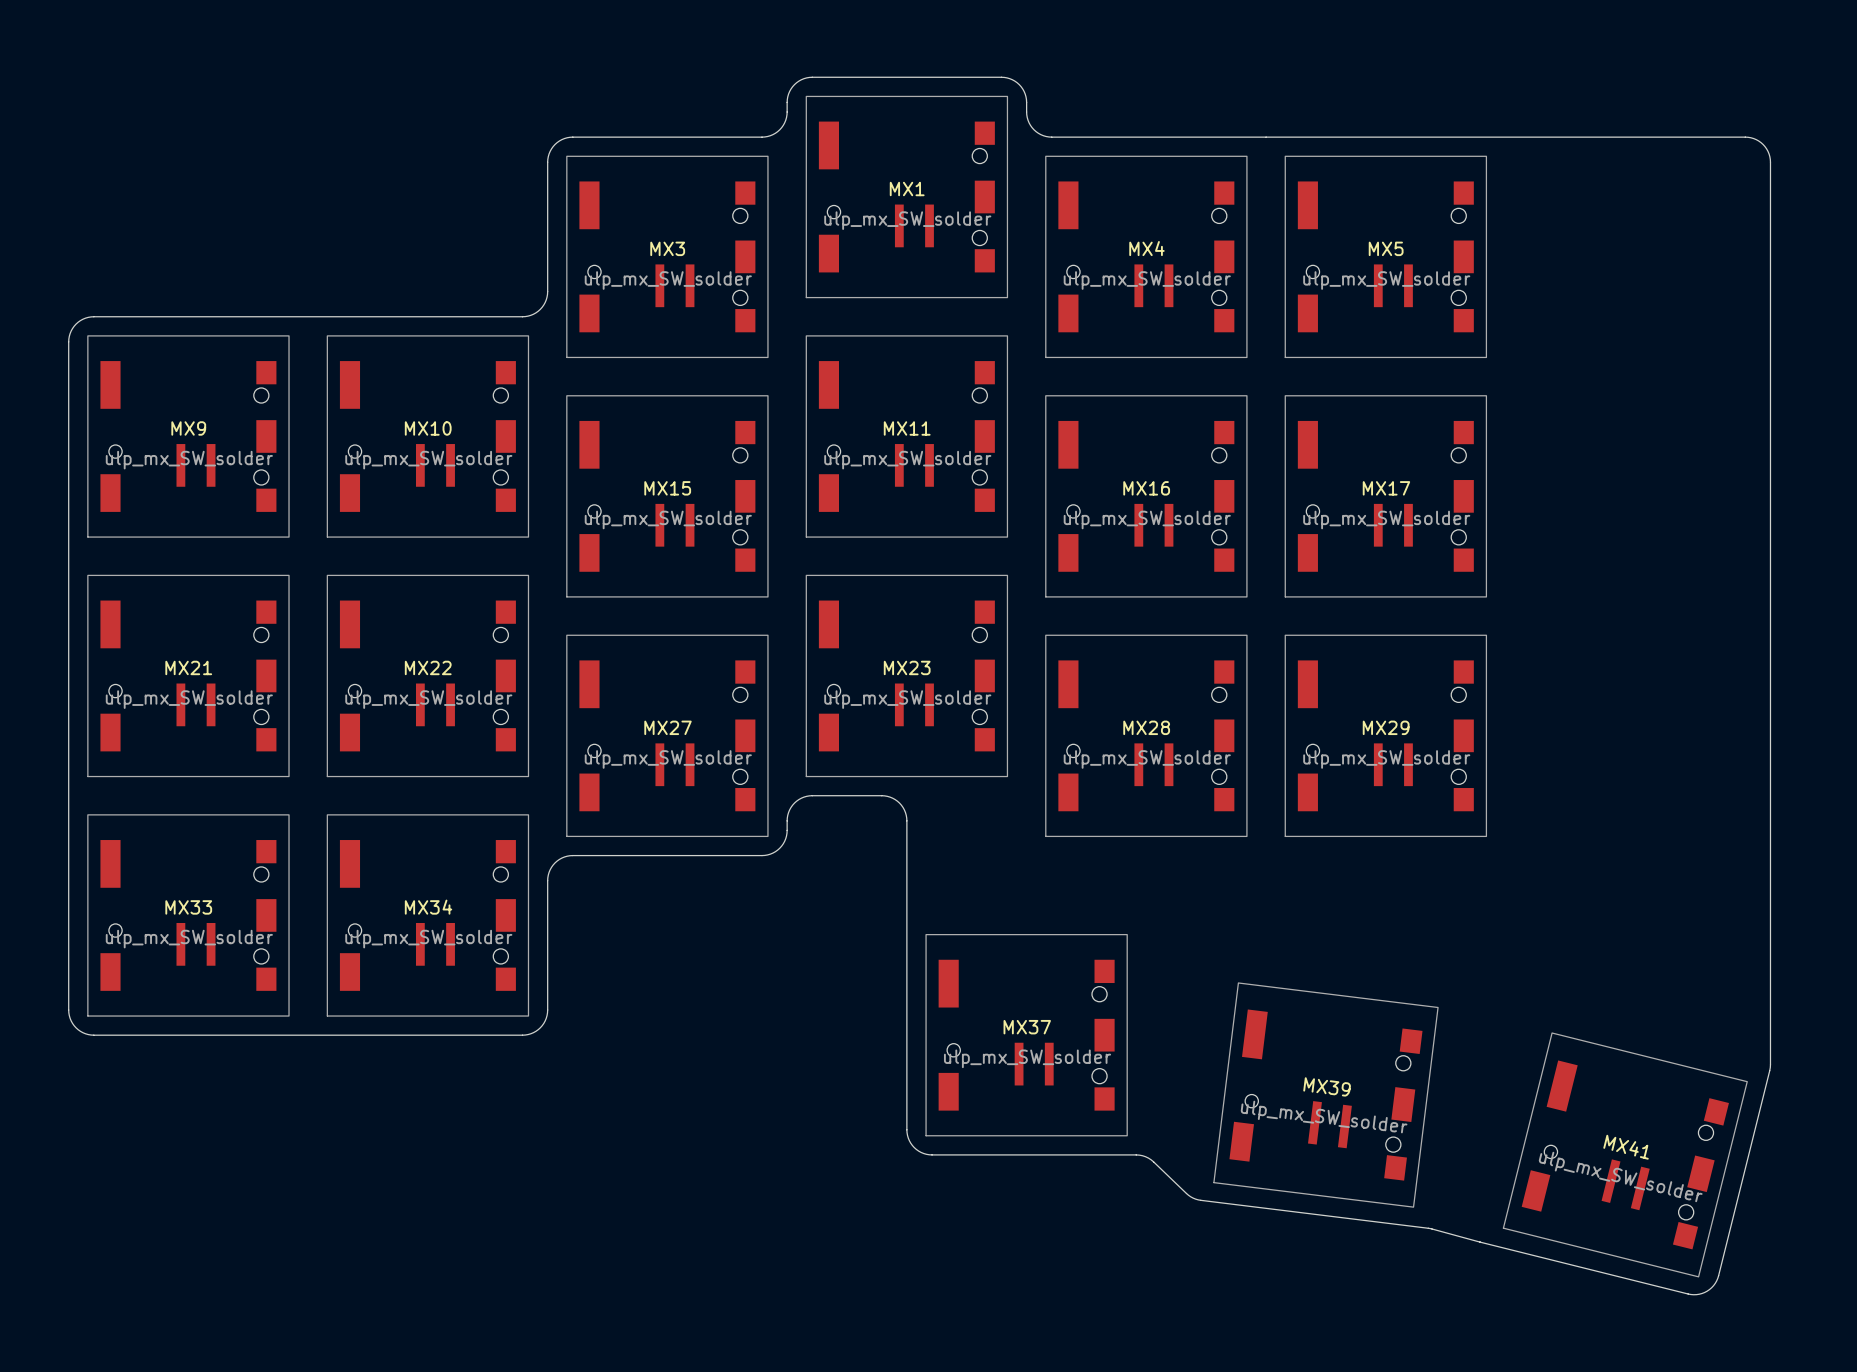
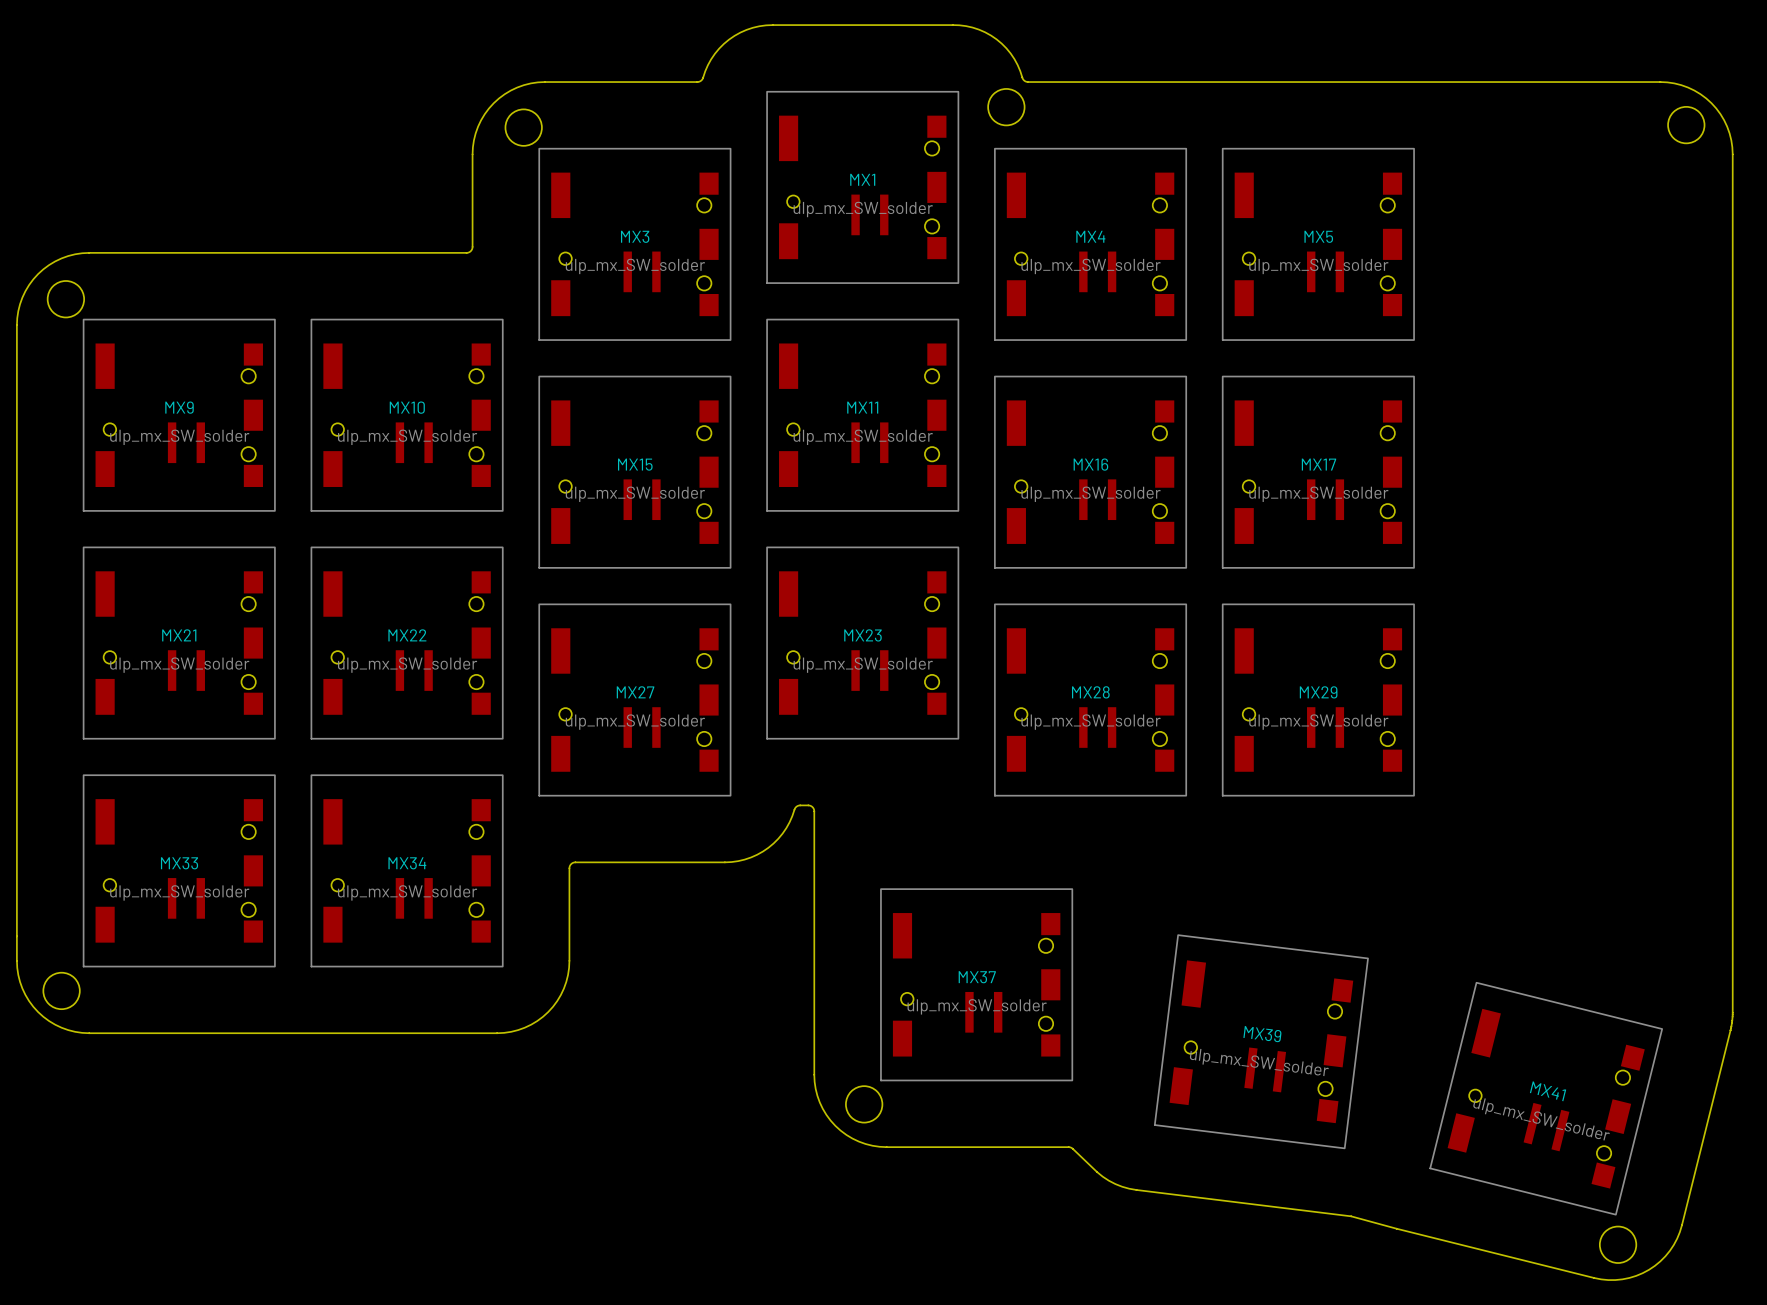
board edge: (812, 77) (1007, 77) (1017, 82) (1024, 91) (1027, 117) (1030, 125) (1038, 133) (1048, 136) (1745, 137) (1756, 139) (1764, 146) (1770, 162) (1770, 1064) (1718, 1275) (1709, 1289) (1699, 1294) (1688, 1294) (1430, 1228) (1198, 1199) (1188, 1195) (1151, 1159) (1139, 1155) (932, 1154) (918, 1151) (909, 1140) (906, 1129) (906, 818) (899, 803) (884, 795) (812, 795) (801, 798) (792, 805) (788, 812) (786, 833) (783, 843) (775, 851) (767, 854) (572, 855) (559, 859) (551, 867) (547, 877) (547, 1015) (540, 1027) (528, 1034) (93, 1035) (82, 1032) (74, 1025) (68, 1010) (68, 341) (74, 326) (82, 319) (93, 316) (530, 315) (542, 307) (547, 294) (547, 159) (551, 148) (557, 142) (572, 137) (767, 136) (777, 131) (784, 122) (787, 96) (792, 86) (801, 79) (812, 77) -> (1730, 1030) (1732, 1012) (1732, 154) (1729, 133) (1720, 114) (1706, 98) (1688, 87) (1660, 82) (1027, 81) (1023, 79) (1014, 59) (1001, 43) (985, 32) (966, 26) (766, 25) (746, 29) (723, 43) (711, 59) (702, 79) (698, 81) (537, 82) (517, 87) (499, 98) (481, 120) (473, 140) (472, 246) (468, 252) (82, 253) (61, 258) (43, 269) (33, 279) (22, 297) (16, 325) (17, 967) (20, 981) (29, 1001) (43, 1016) (61, 1027) (89, 1033) (497, 1033) (518, 1030) (531, 1024) (548, 1012) (557, 1001) (566, 981) (569, 960) (569, 868) (571, 863) (724, 862) (744, 859) (762, 851) (778, 838) (786, 828) (796, 806) (808, 805) (812, 807) (814, 811) (814, 1081) (817, 1095) (826, 1114) (835, 1125) (852, 1138) (865, 1144) (886, 1147) (1069, 1147) (1102, 1176) (1129, 1188) (1351, 1216) (1608, 1280) (1629, 1277) (1649, 1269) (1665, 1256) (1677, 1238) (1730, 1030)
round board edge: none -> [987, 88, 1025, 126]
round board edge: none -> [1667, 106, 1705, 144]
round board edge: none -> [505, 109, 543, 147]
round board edge: none -> [47, 280, 85, 318]
round board edge: none -> [43, 972, 81, 1010]
round board edge: none -> [845, 1085, 883, 1123]
round board edge: none -> [1599, 1226, 1637, 1264]

